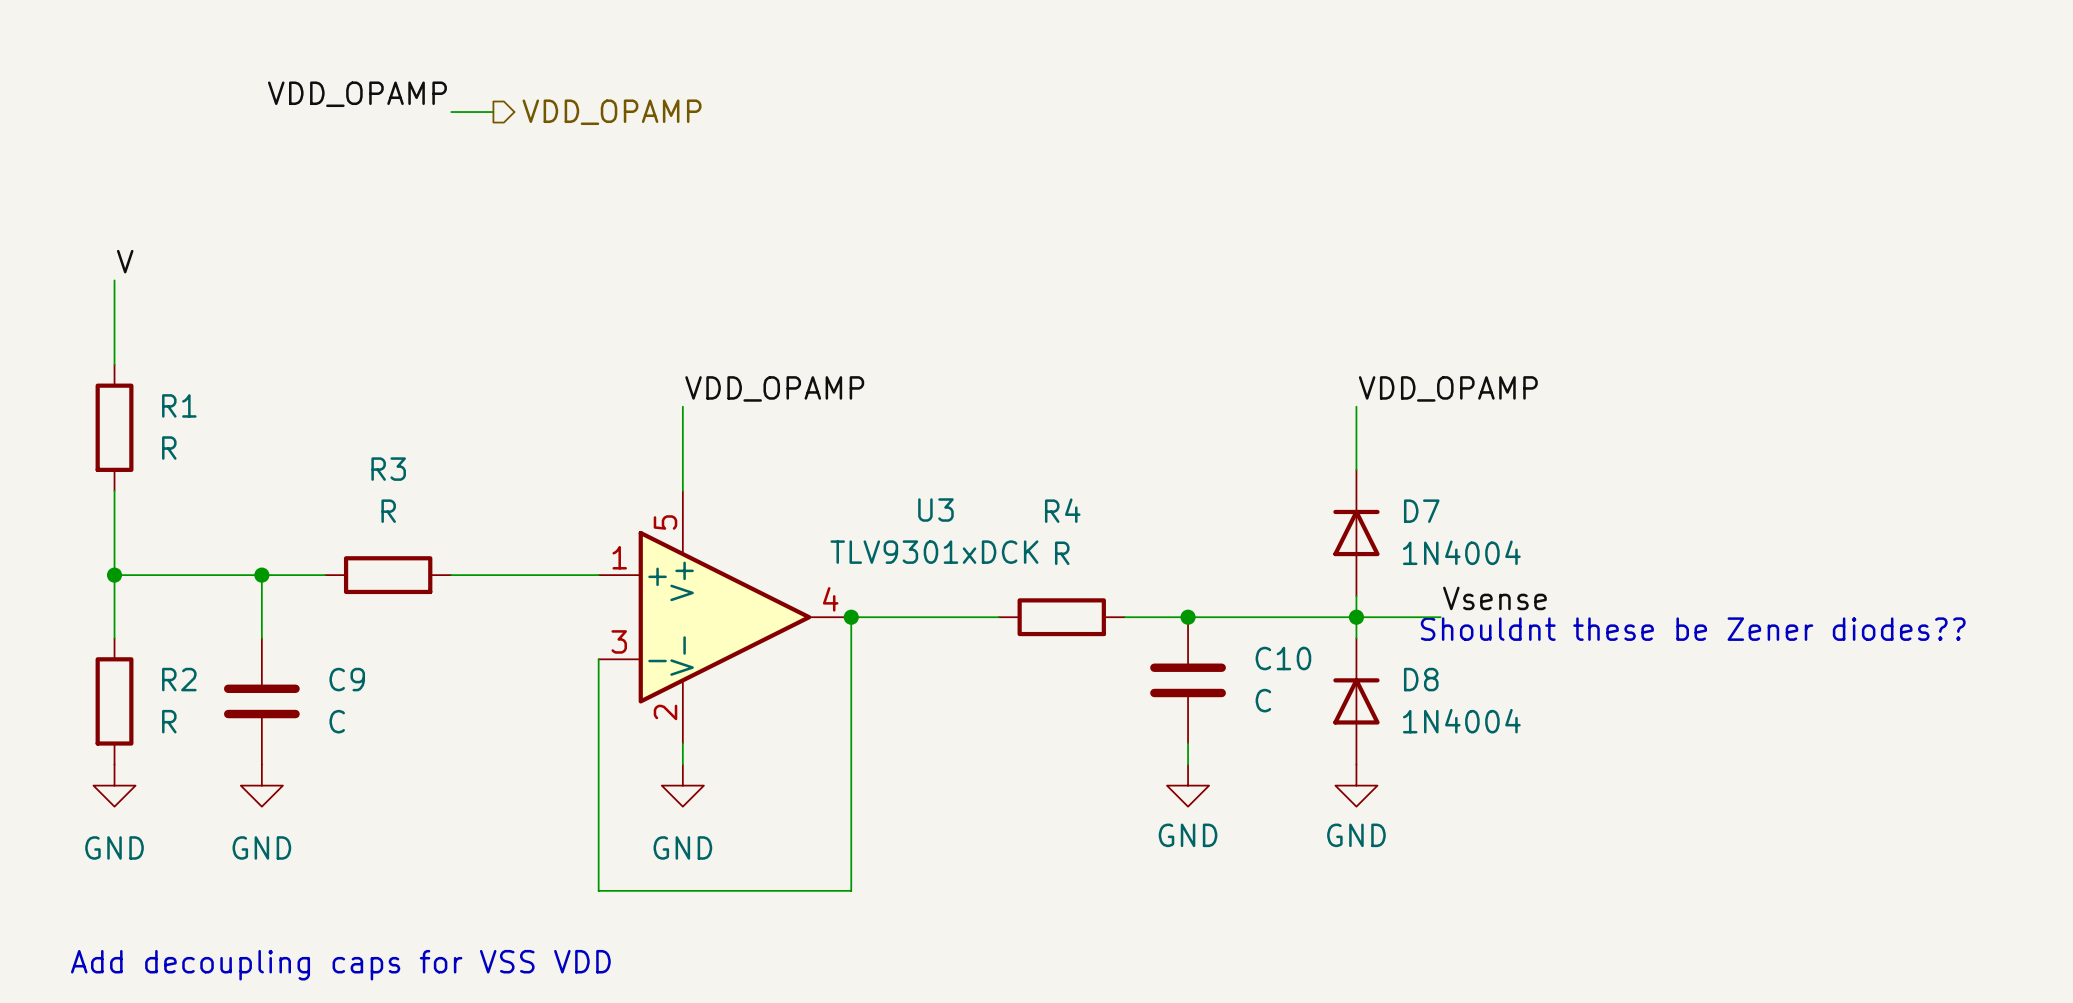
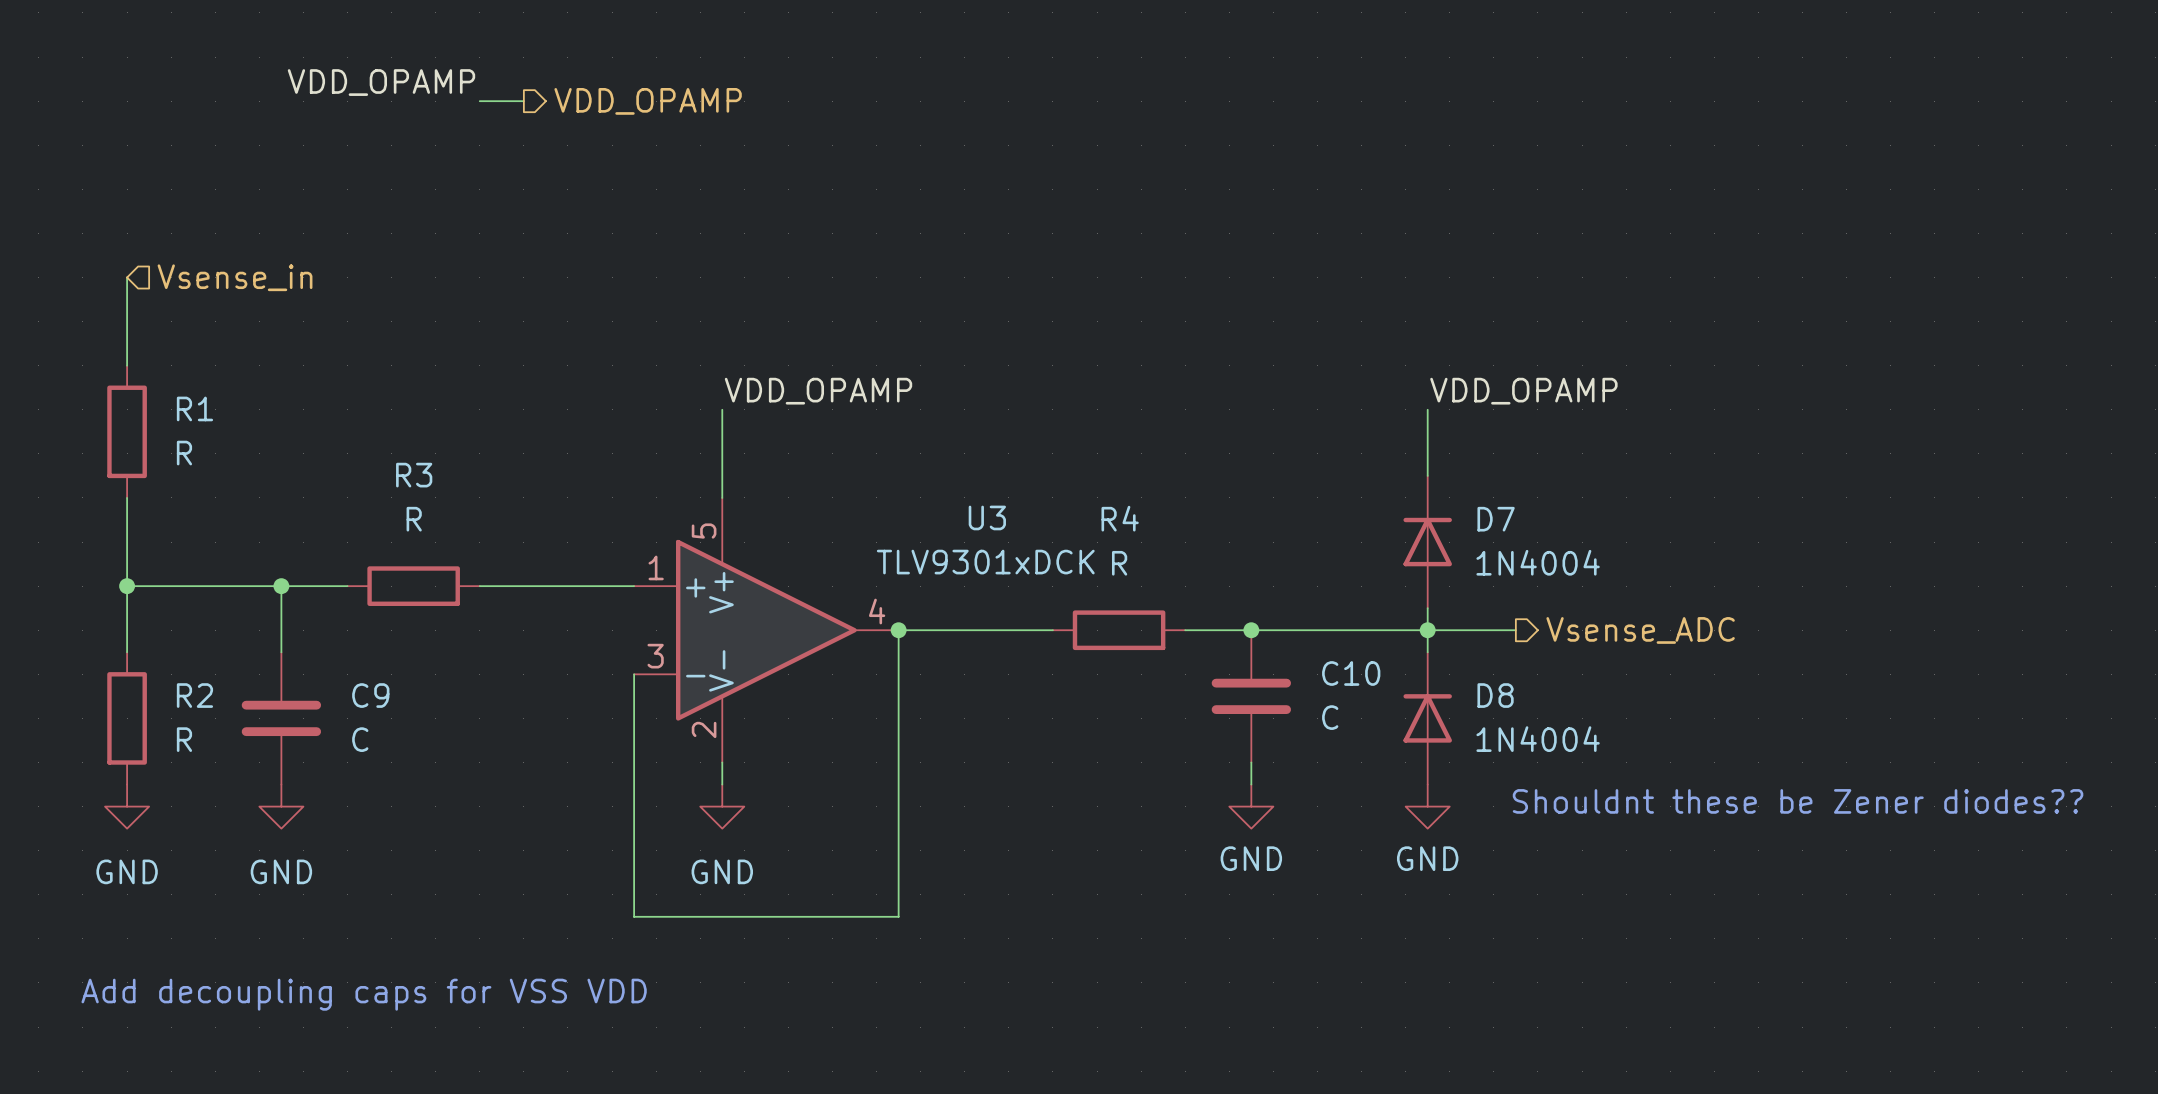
label: V (125, 261) -> none
hierarchical label: none -> Vsense_in (235, 277)
label: Vsense (1494, 598) -> none
hierarchical label: none -> Vsense_ADC (1640, 630)
text position: Shouldnt these be Zener diodes?? (1693, 629) -> Shouldnt these be Zener diodes?? (1798, 801)

